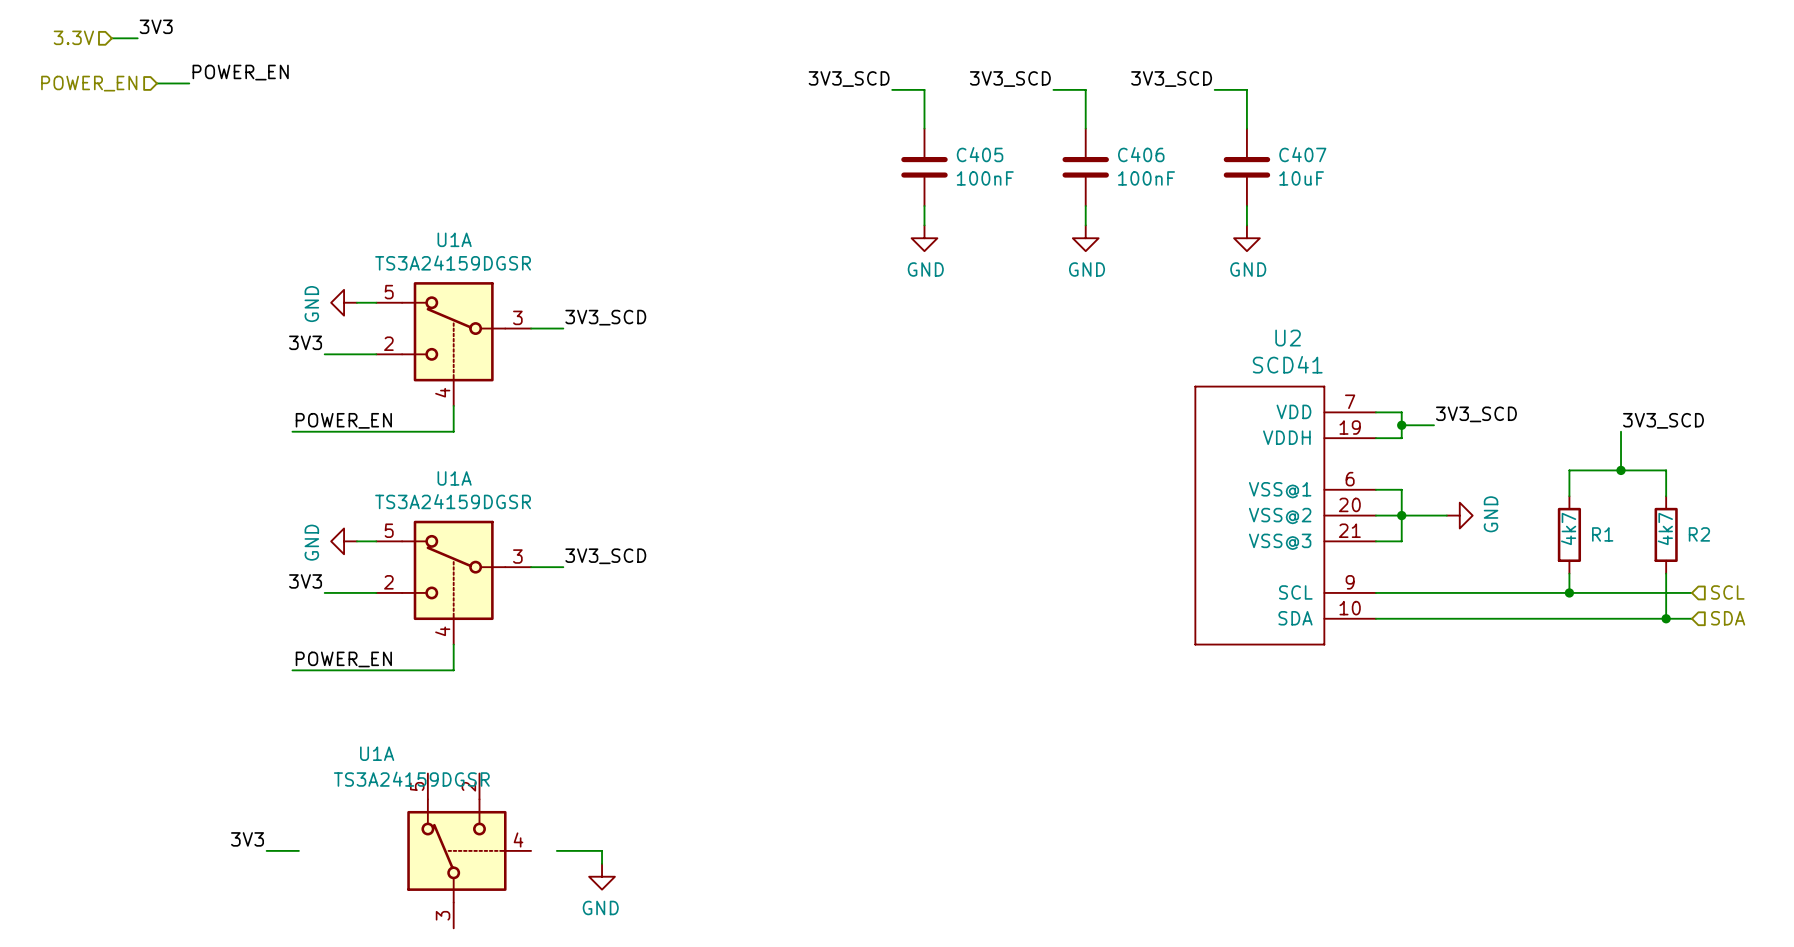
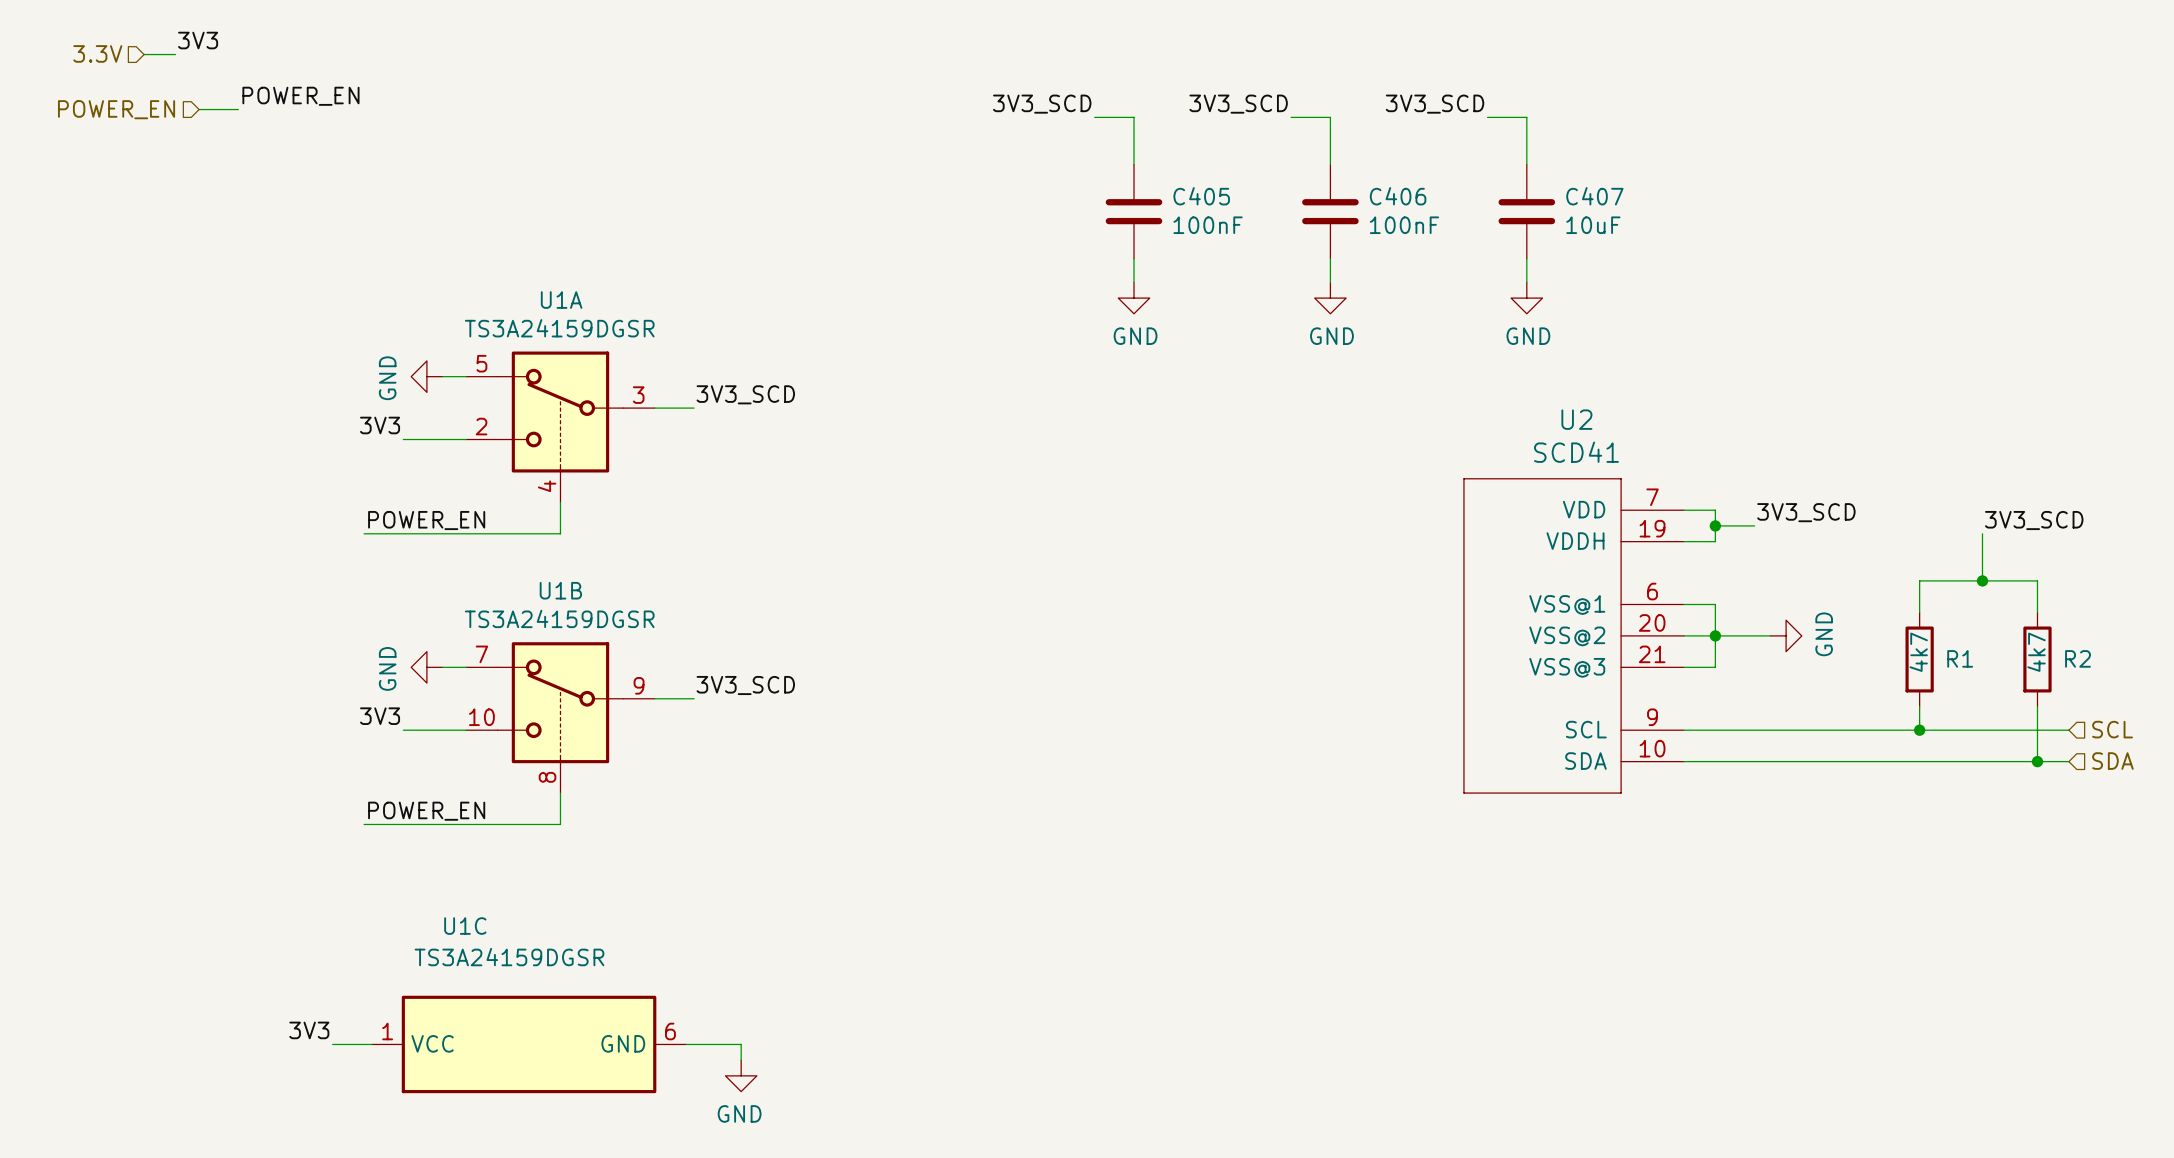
U1A name: U1A (454, 478) -> U1B (560, 590)
U1A pin number: 5 (389, 530) -> 7 (481, 654)
U1A pin number: 3 (517, 556) -> 9 (639, 685)
U1A pin number: 2 (388, 582) -> 10 (481, 717)
U1A pin number: 4 (442, 631) -> 8 (547, 777)
U1C: none -> TS3A24159DGSR (529, 1044)
U1A: TS3A24159DGSR (469, 850) -> none

